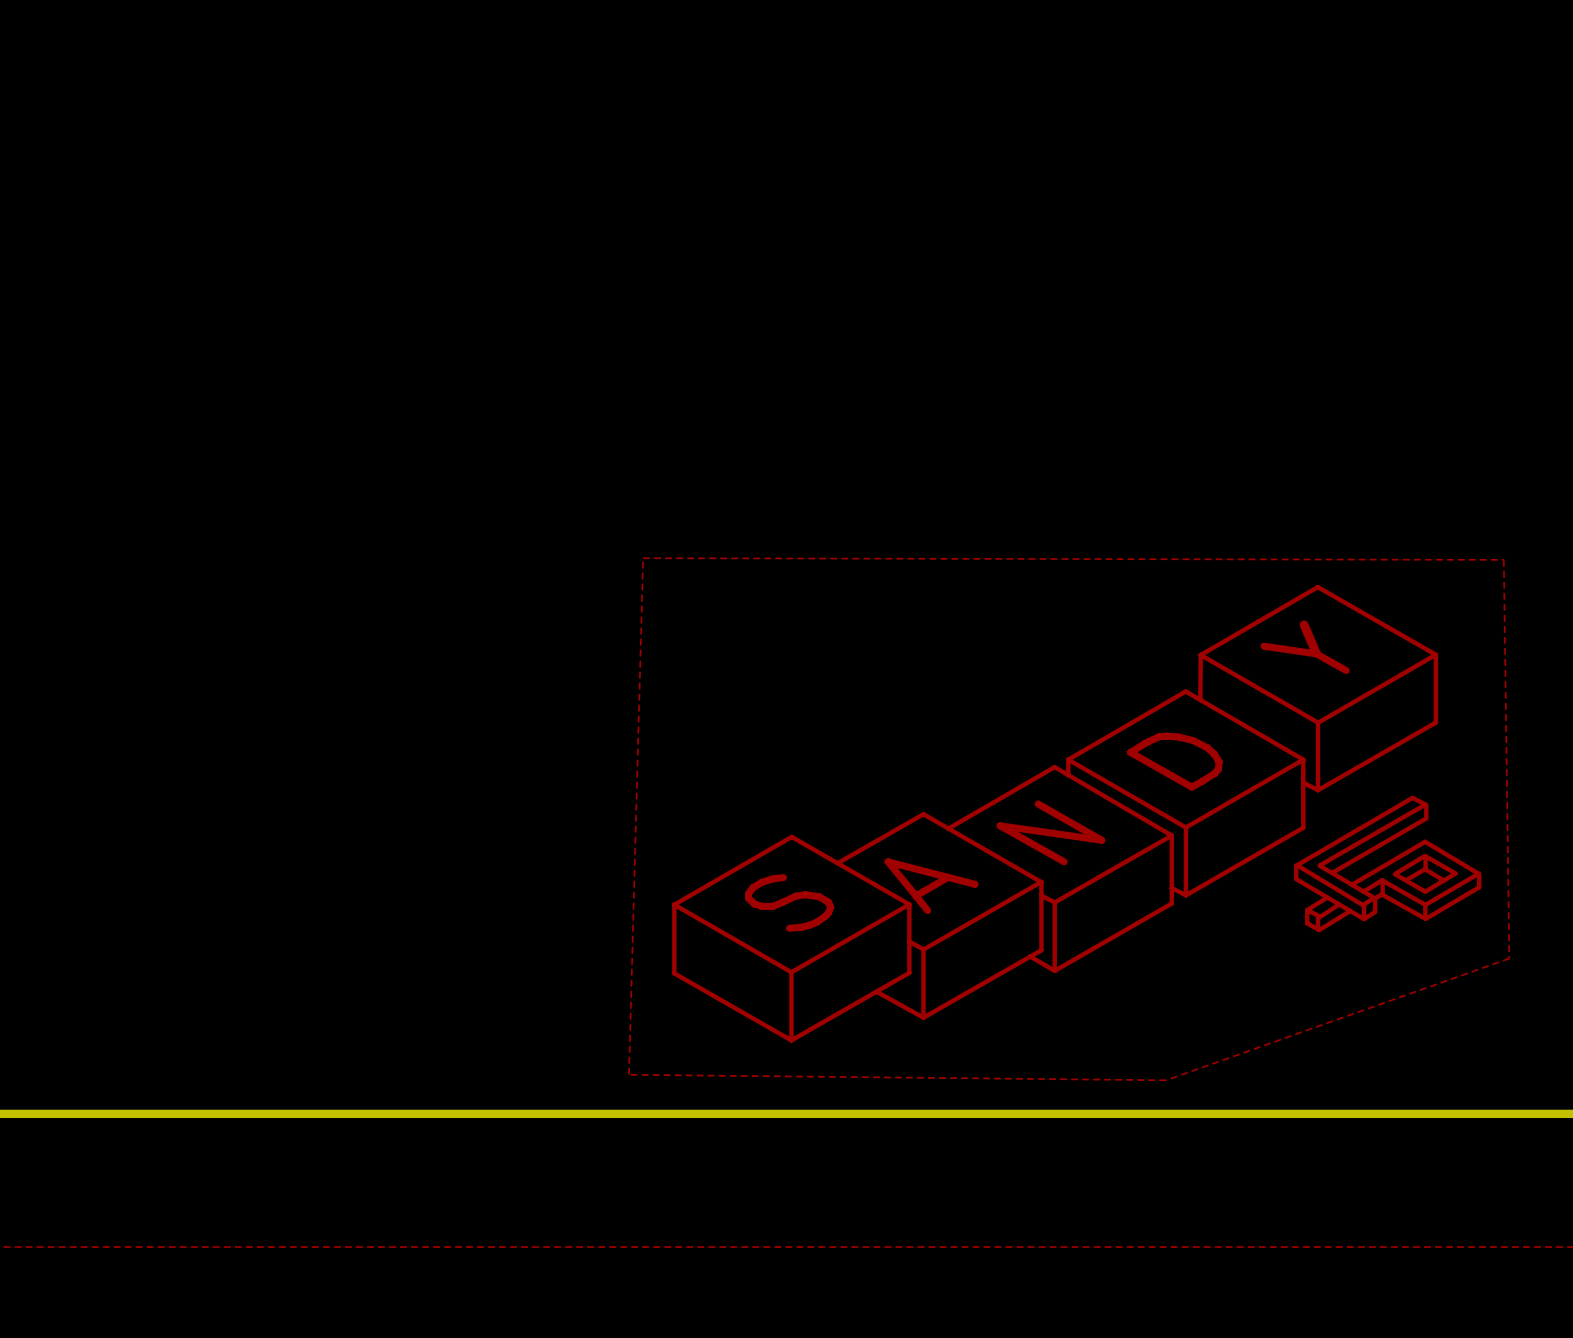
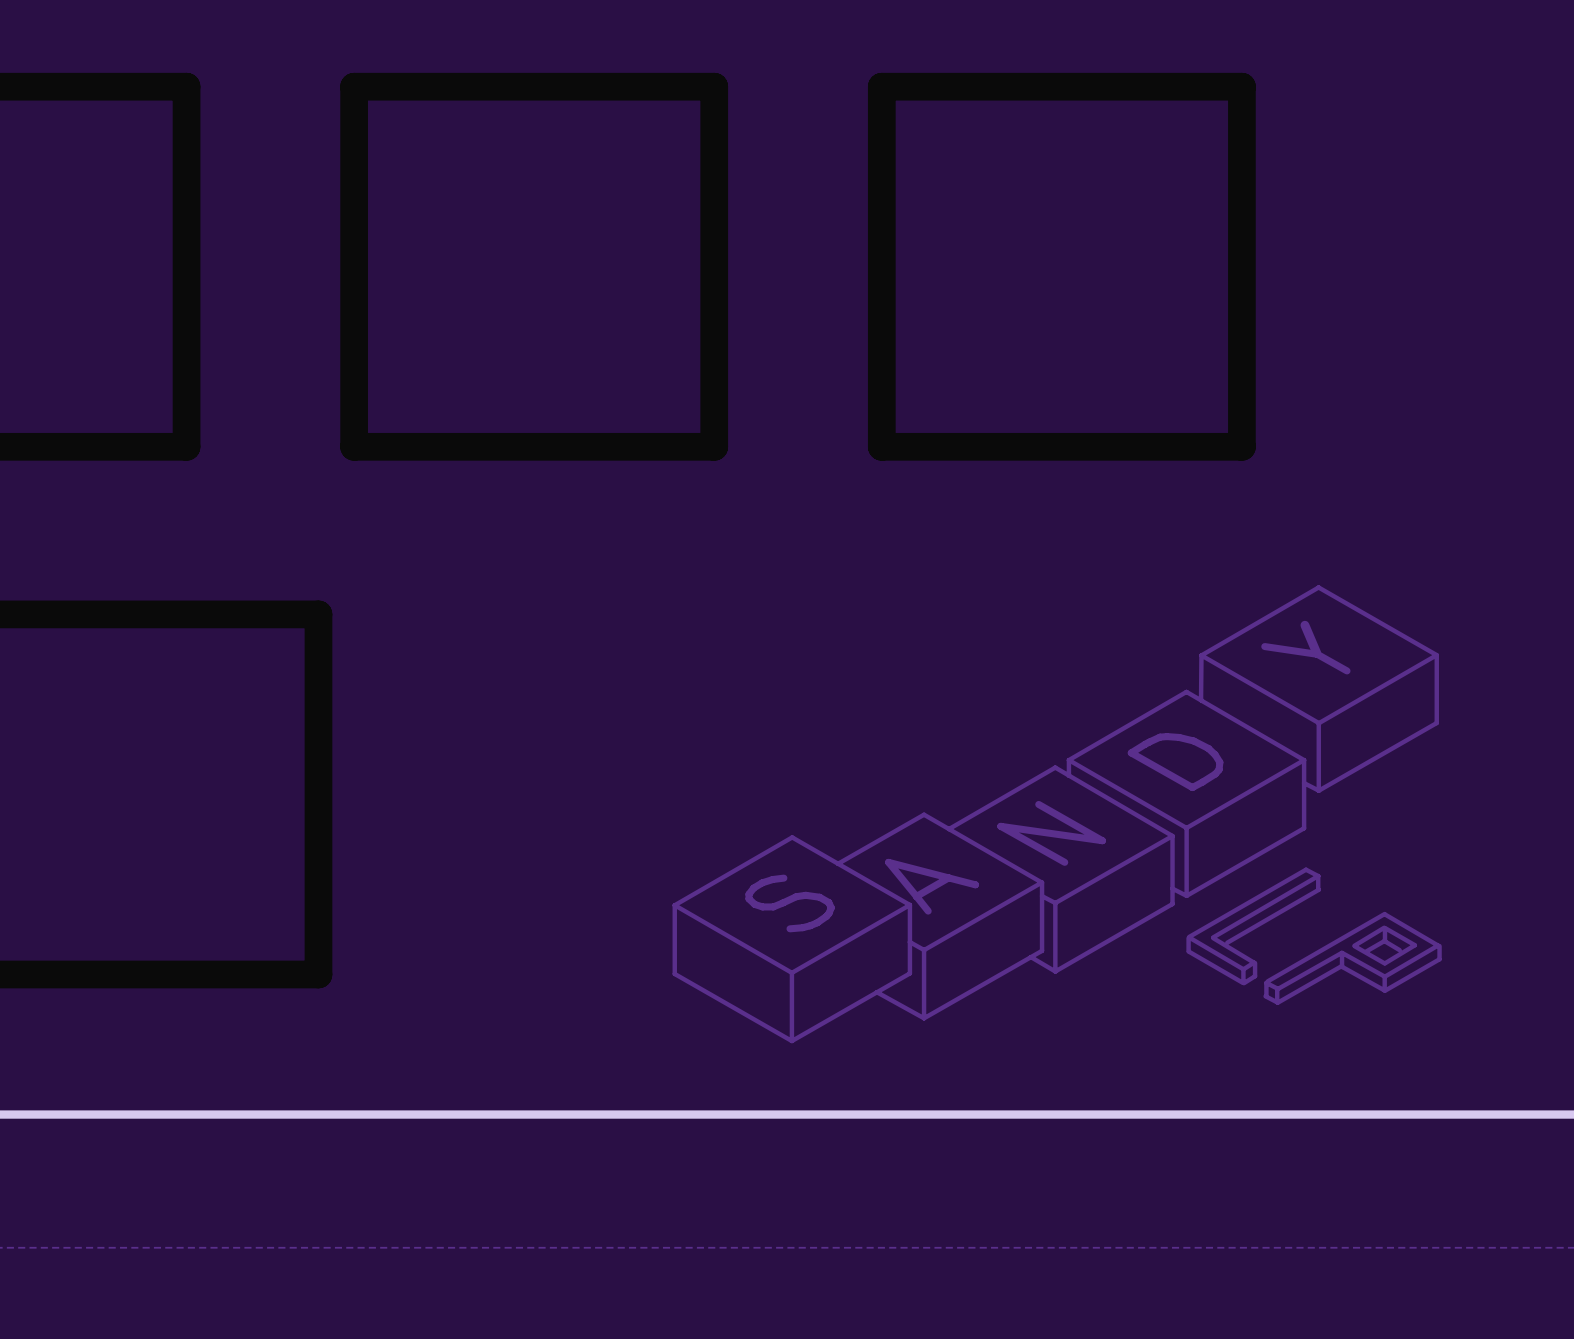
zone outline: (643, 558) (1503, 559) (1509, 958) (1166, 1080) (629, 1074) (643, 558) -> none
track: (1412, 797) (1296, 865) (1296, 878) -> none
track: (1413, 798) (1426, 804) -> none
track: (1425, 804) (1319, 865) -> none
track: (1426, 805) (1426, 818) -> none
track: (1424, 819) (1333, 872) -> none
track: (1424, 855) (1395, 873) -> (1384, 927) (1354, 945)
track: (1425, 856) (1425, 869) -> (1384, 928) (1384, 941)
track: (1425, 856) (1455, 873) (1425, 891) -> none
track: (1297, 865) (1362, 905) (1373, 898) -> none
track: (1319, 865) (1373, 897) -> none
track: (1425, 868) (1407, 879) -> (1384, 940) (1366, 951)
track: (1425, 869) (1443, 880) -> none
track: (1395, 874) (1425, 891) -> (1354, 946) (1384, 963)
track: (1479, 874) (1479, 887) (1425, 918) -> none
track: none -> (1318, 876) (1306, 869) (1189, 937)
track: none -> (1318, 876) (1318, 889) (1227, 942)
track: none -> (1318, 876) (1213, 937)
track: (1296, 879) (1364, 919) (1375, 912) -> none
track: (1382, 880) (1382, 893) -> (1188, 938) (1188, 951)
track: (1351, 884) (1425, 841) (1478, 873) (1425, 904) -> none
track: (1363, 891) (1382, 880) (1424, 904) -> none
track: (1381, 894) (1375, 898) (1375, 911) -> none
track: (1382, 895) (1425, 918) (1425, 905) -> (1342, 966) (1384, 990) (1384, 977)
track: (1327, 897) (1307, 910) -> none
track: (1339, 904) (1318, 918) -> none
track: (1364, 904) (1364, 918) -> (1277, 989) (1277, 1002)
track: (1307, 910) (1319, 916) -> (1265, 996) (1277, 1002)
track: (1307, 910) (1307, 923) (1318, 929) -> none
track: (1350, 910) (1319, 929) -> none
track: none -> (1384, 914) (1267, 981)
track: none -> (1385, 914) (1438, 945) (1385, 976)
track: (1318, 916) (1318, 929) -> (1342, 953) (1342, 966)
track: none -> (1385, 928) (1414, 945)
track: none -> (1189, 937) (1242, 969)
track: none -> (1213, 938) (1253, 962) (1243, 969) (1243, 982)
track: none -> (1384, 941) (1399, 950)
track: none -> (1414, 945) (1385, 963)
track: none -> (1439, 946) (1439, 959) (1385, 990)
track: none -> (1188, 951) (1242, 982)
track: none -> (1341, 953) (1278, 988)
track: none -> (1341, 952) (1384, 976)
track: none -> (1255, 963) (1255, 976) (1243, 983)
track: none -> (1341, 966) (1278, 1002)
track: none -> (1278, 989) (1266, 982) (1266, 996)

